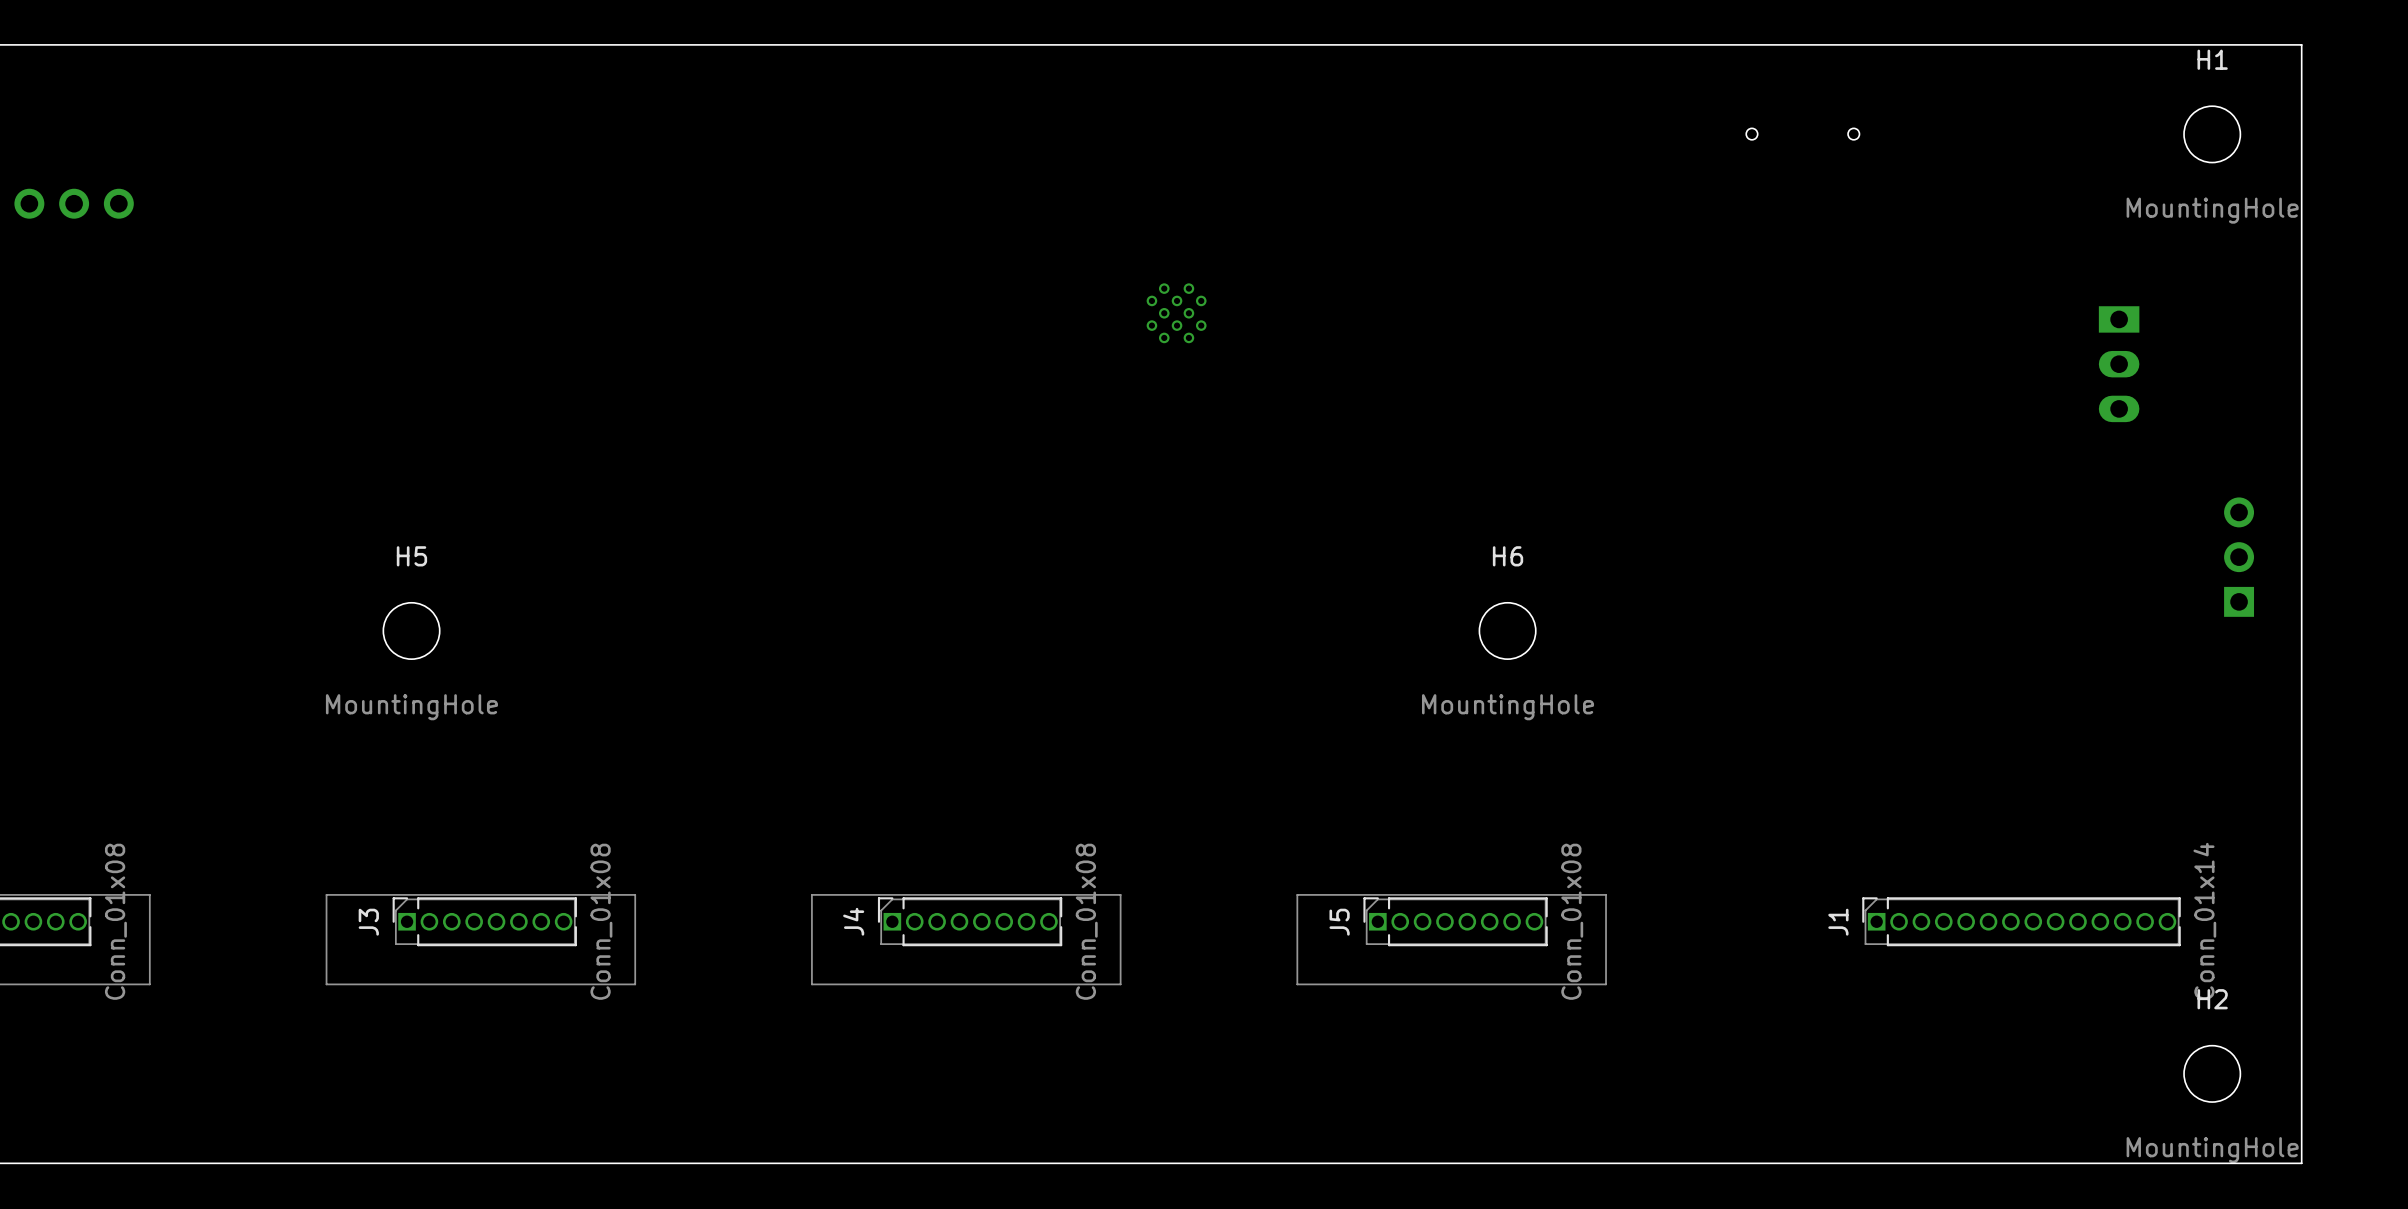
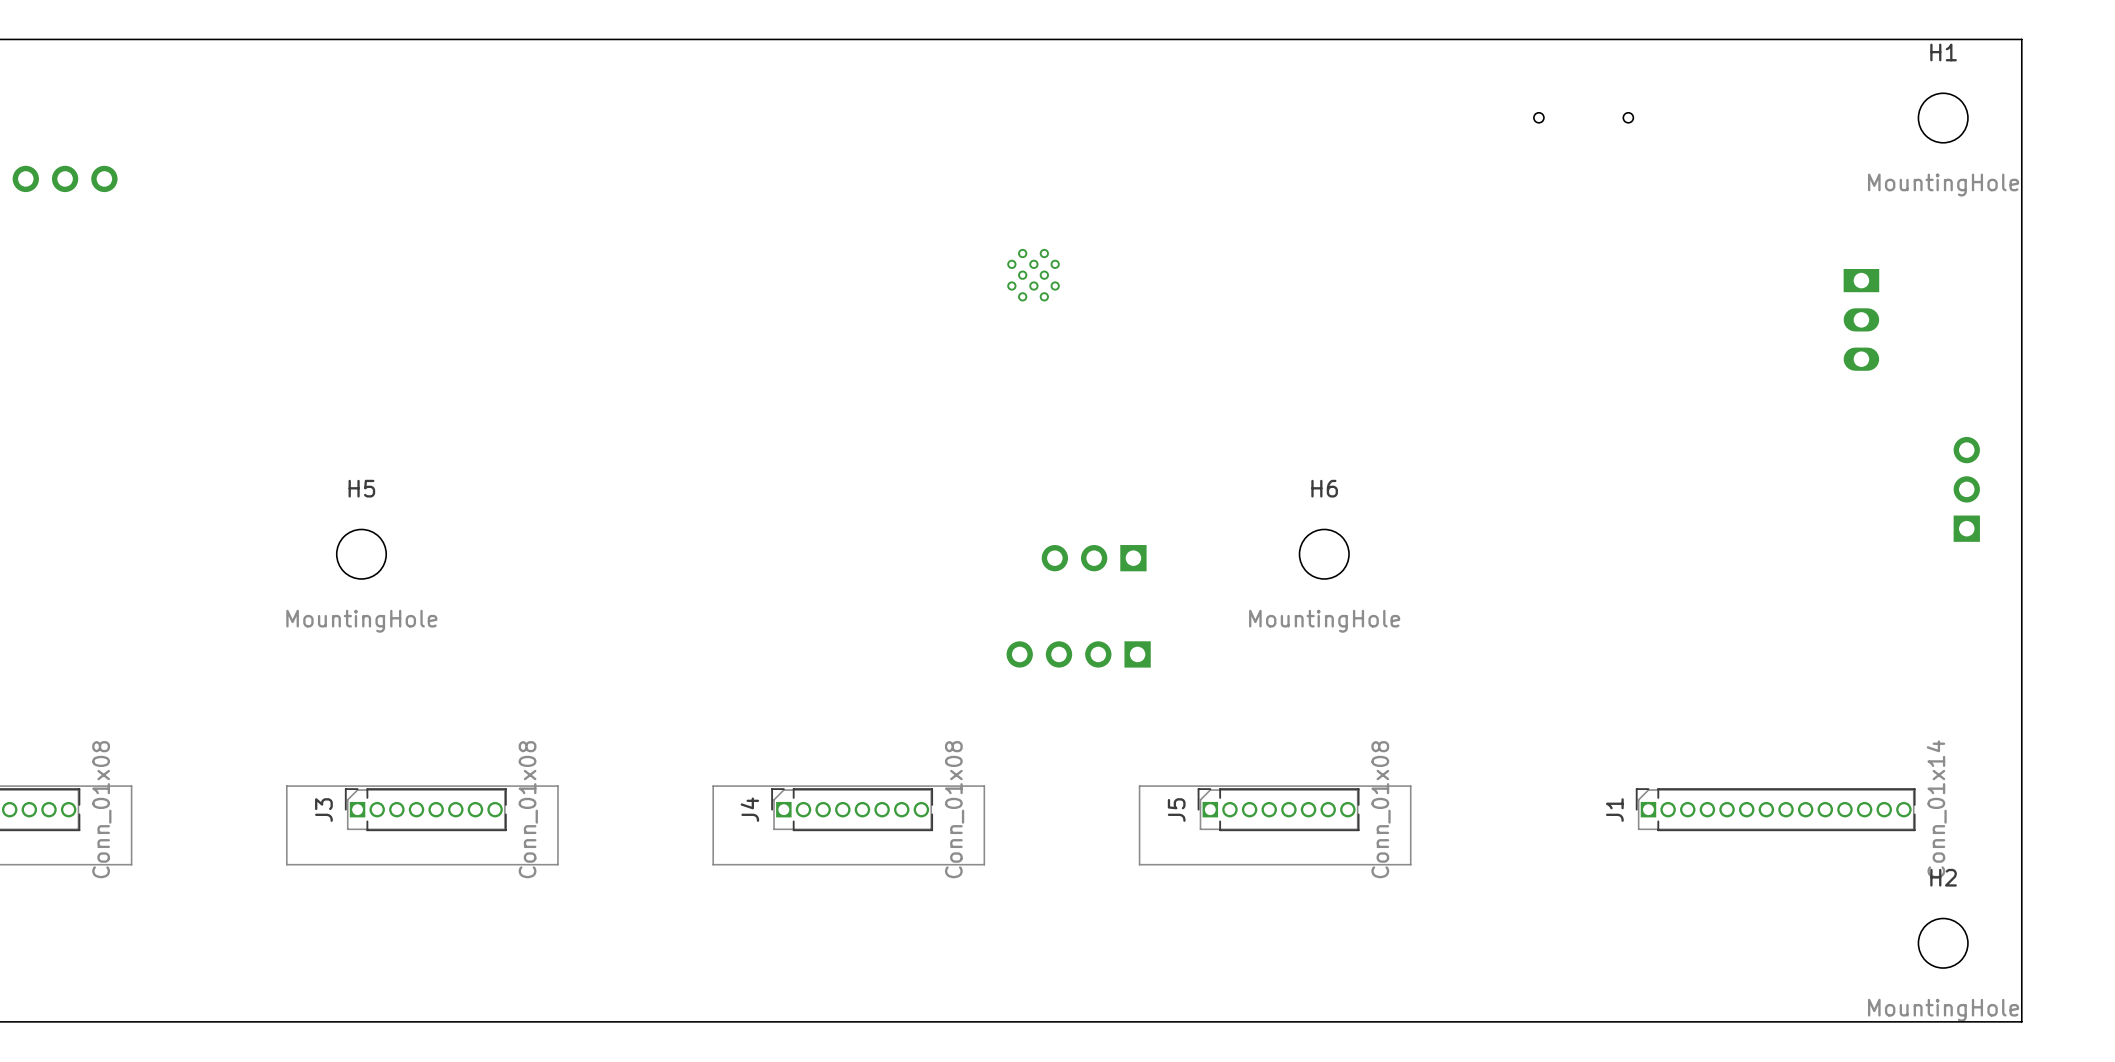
part: none -> (1094, 558)
part: none -> (1078, 654)

